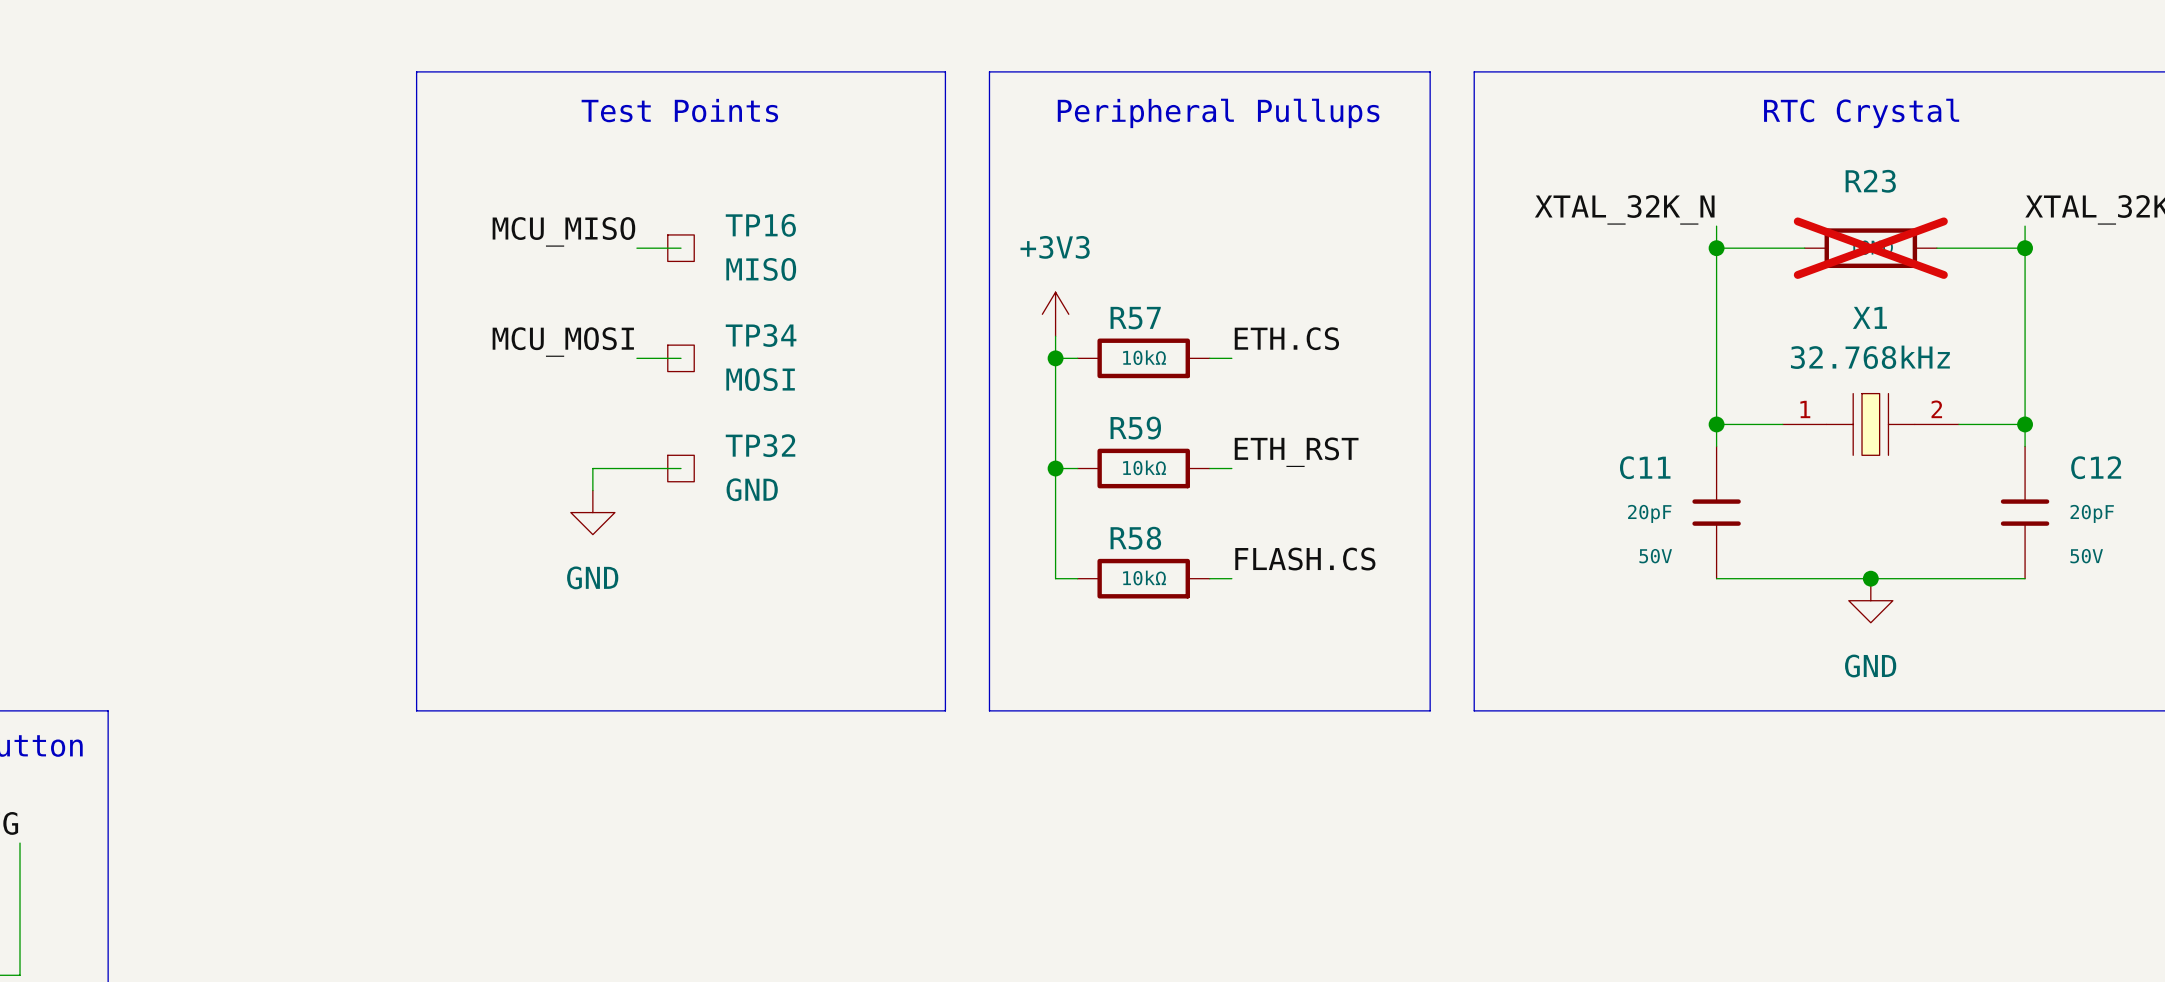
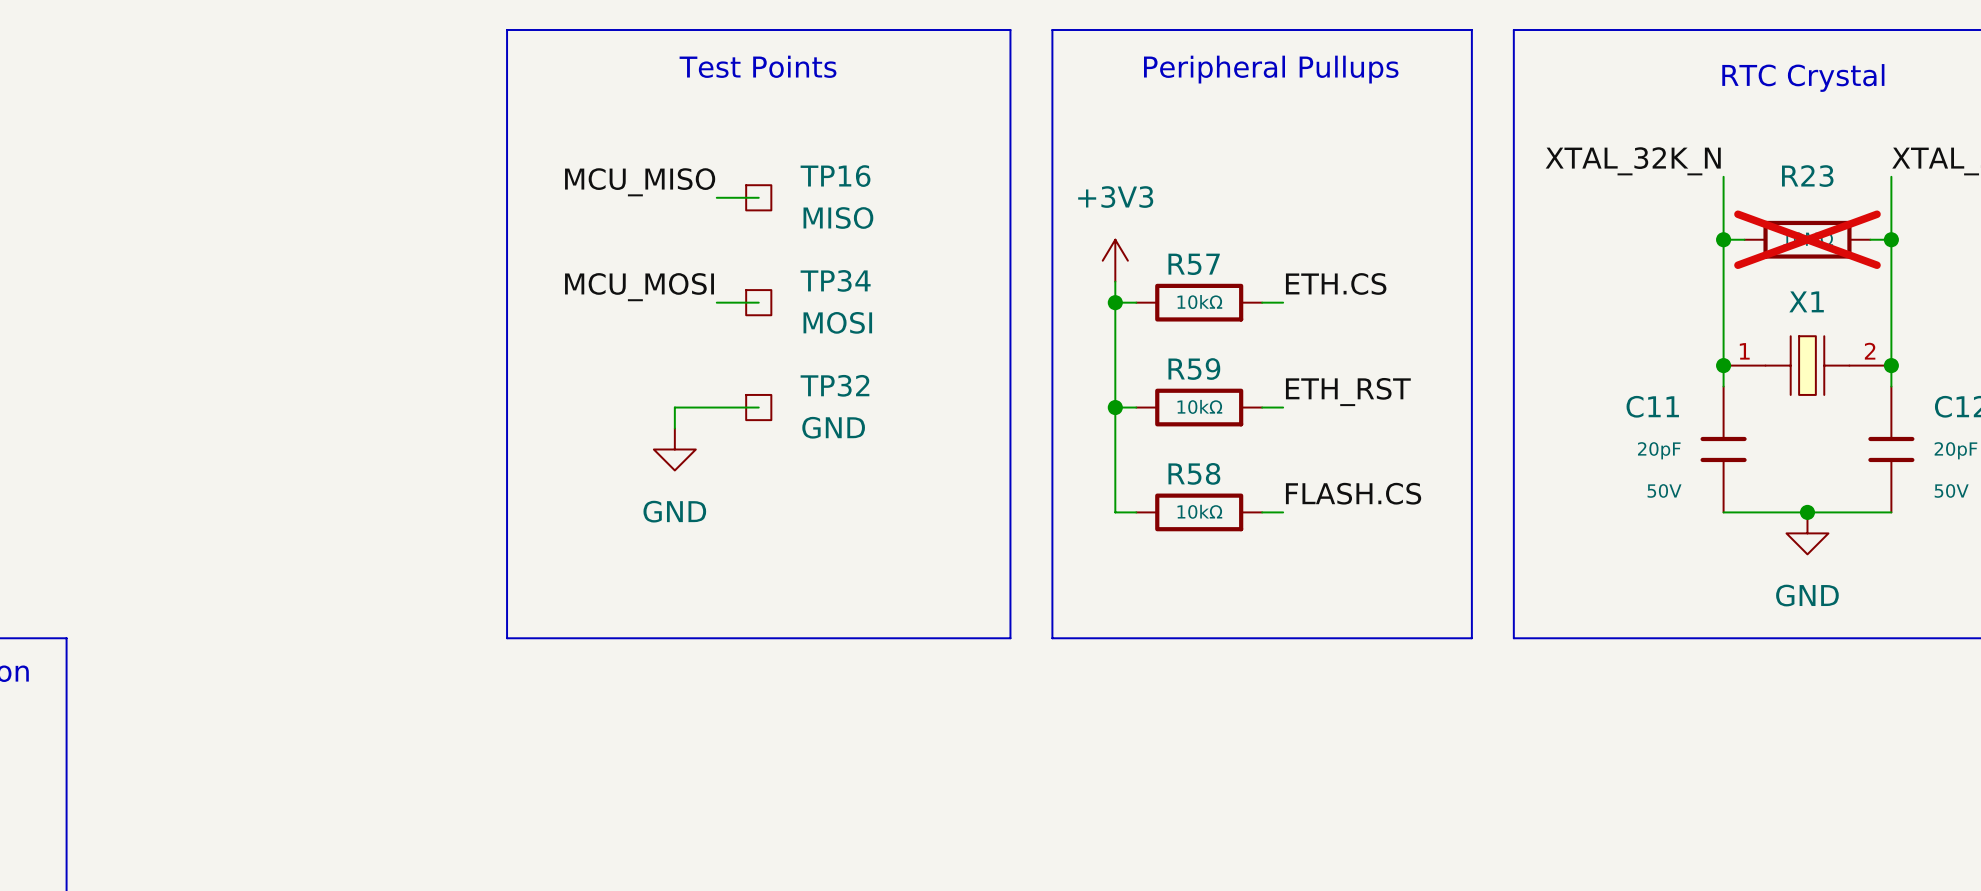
line: (570, 71) (416, 71) (416, 710) (570, 710) -> (507, 29) (507, 638)
line: (945, 71) (945, 710) -> (863, 29) (905, 29)
line: (989, 71) (989, 710) -> (863, 638) (905, 638)
line: (1099, 71) (1143, 71) -> (1010, 29) (1010, 638)
line: (1430, 71) (1430, 710) -> (1325, 29) (1367, 29)
line: (1474, 71) (1474, 710) -> (1325, 638) (1367, 638)
line: (1584, 71) (1628, 71) -> (1471, 29) (1471, 638)
text position: Test Points (679, 110) -> Test Points (758, 66)
text position: Peripheral Pullups (1218, 113) -> Peripheral Pullups (1271, 69)
text position: RTC Crystal (1861, 113) -> RTC Crystal (1803, 77)
label position: XTAL_32K_N (1624, 209) -> XTAL_32K_N (1633, 161)
wire: (1716, 226) (1716, 446) -> (1723, 176) (1723, 386)
label position: MCU_MISO (563, 231) -> MCU_MISO (640, 182)
wire: (636, 248) (681, 248) -> (716, 197) (758, 197)
TP16 position: (681, 248) -> (758, 197)
wire: (1716, 248) (1804, 248) -> none
junction: (1716, 248) -> none
R23 position: (1870, 248) -> (1807, 239)
wire: (1936, 248) (2025, 248) -> none
junction position: (2025, 248) -> (1891, 239)
wire: none -> (1723, 239) (1744, 239)
junction: none -> (1723, 239)
wire: none -> (1870, 239) (1891, 239)
power symbol position: +3V3 (1055, 314) -> +3V3 (1115, 260)
X1 name position: X1 (1869, 317) -> X1 (1806, 301)
wire: (1055, 336) (1055, 578) (1077, 578) -> none
wire: none -> (1115, 281) (1115, 512)
label position: ETH.CS (1286, 338) -> ETH.CS (1336, 283)
label position: MCU_MOSI (563, 342) -> MCU_MOSI (639, 287)
X1 value: 32.768kHz (1870, 357) -> none
wire: (636, 358) (681, 358) -> (716, 302) (758, 302)
TP34 position: (681, 358) -> (758, 302)
wire: (1055, 358) (1077, 358) -> (1262, 302) (1283, 302)
junction: (1055, 358) -> none
R57 position: (1143, 358) -> (1199, 302)
junction: none -> (1115, 302)
wire: (1716, 424) (1782, 424) -> none
junction: (1716, 424) -> none
junction: none -> (1723, 365)
X1 position: (1870, 424) -> (1807, 365)
label position: ETH_RST (1296, 452) -> ETH_RST (1348, 392)
wire: (681, 468) (592, 468) (592, 490) -> (758, 407) (674, 407) (674, 428)
TP32 position: (681, 468) -> (758, 407)
wire: (1055, 468) (1077, 468) -> (1262, 407) (1283, 407)
junction: (1055, 468) -> none
R59 position: (1143, 468) -> (1199, 407)
junction: none -> (1115, 407)
power symbol position: GND (592, 512) -> GND (674, 449)
C11 position: (1716, 512) -> (1723, 449)
label position: FLASH.CS (1305, 559) -> FLASH.CS (1353, 493)
R58 position: (1143, 578) -> (1199, 512)
wire: none -> (1262, 512) (1283, 512)
wire: (1716, 578) (1848, 578) -> none
junction position: (1870, 578) -> (1807, 512)
power symbol position: GND (1870, 600) -> GND (1807, 533)
line: (1099, 710) (1143, 710) -> (1052, 29) (1052, 638)
line: (1584, 710) (1628, 710) -> (1513, 29) (1513, 638)

